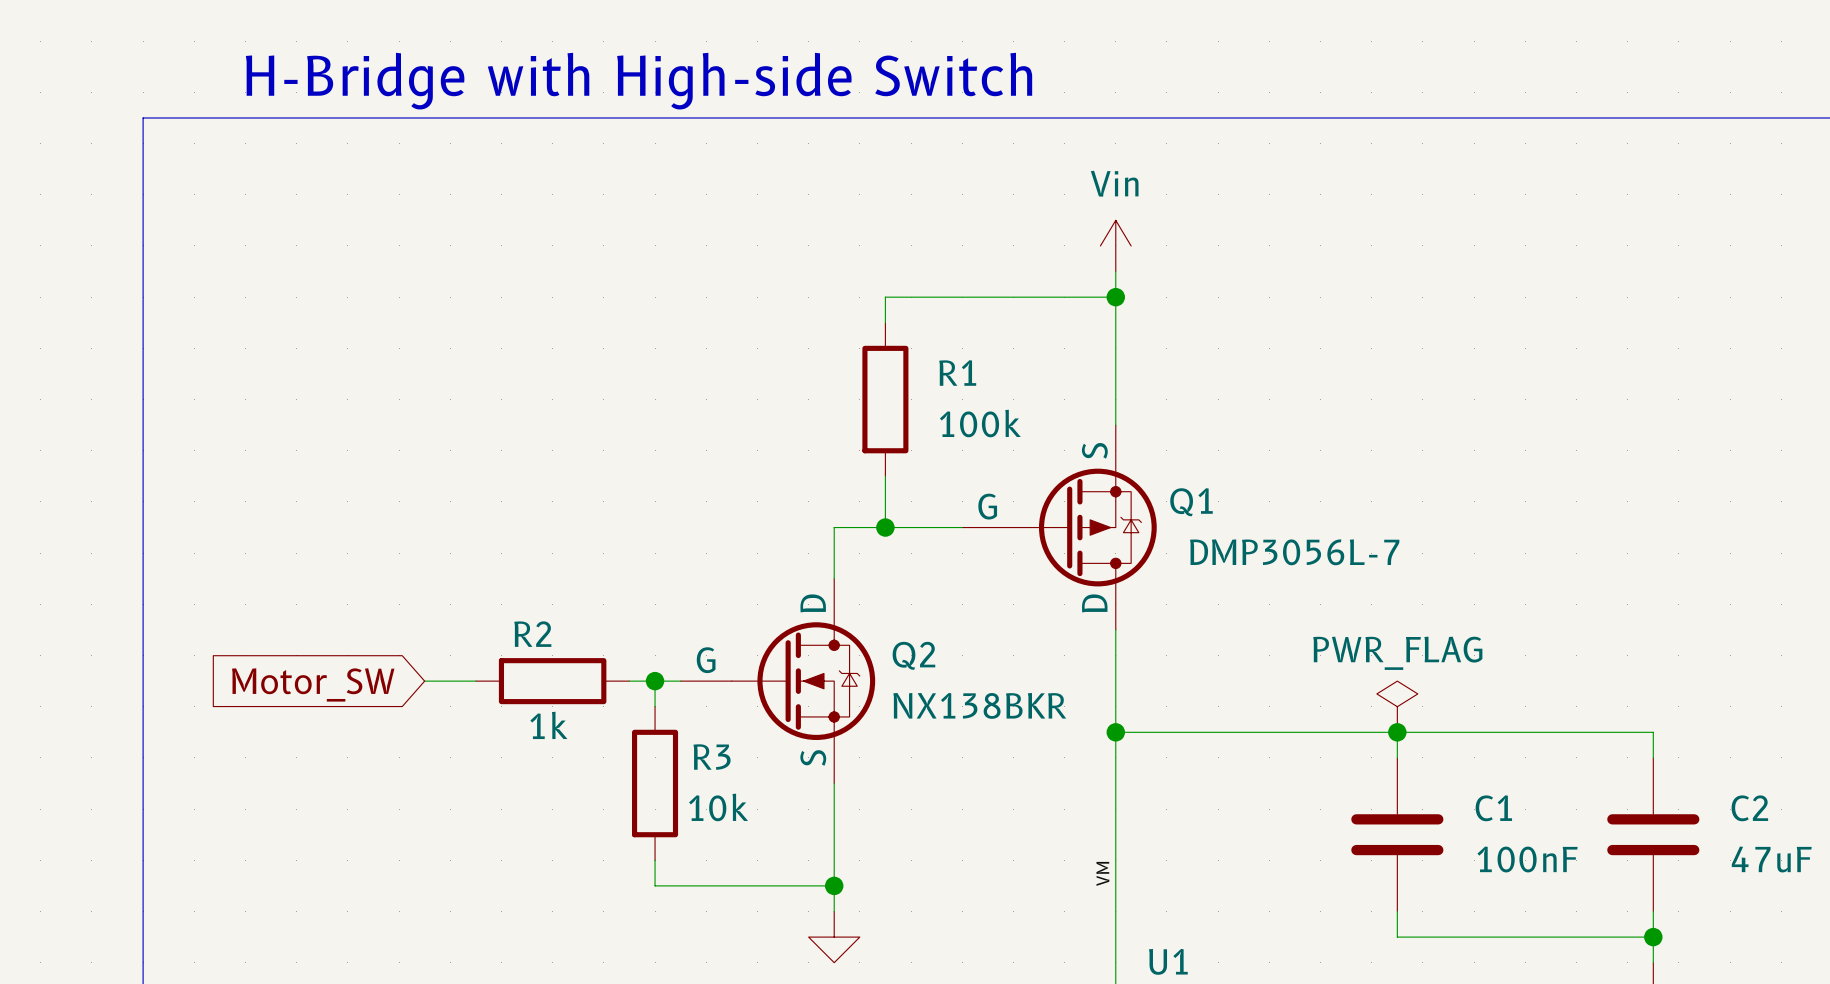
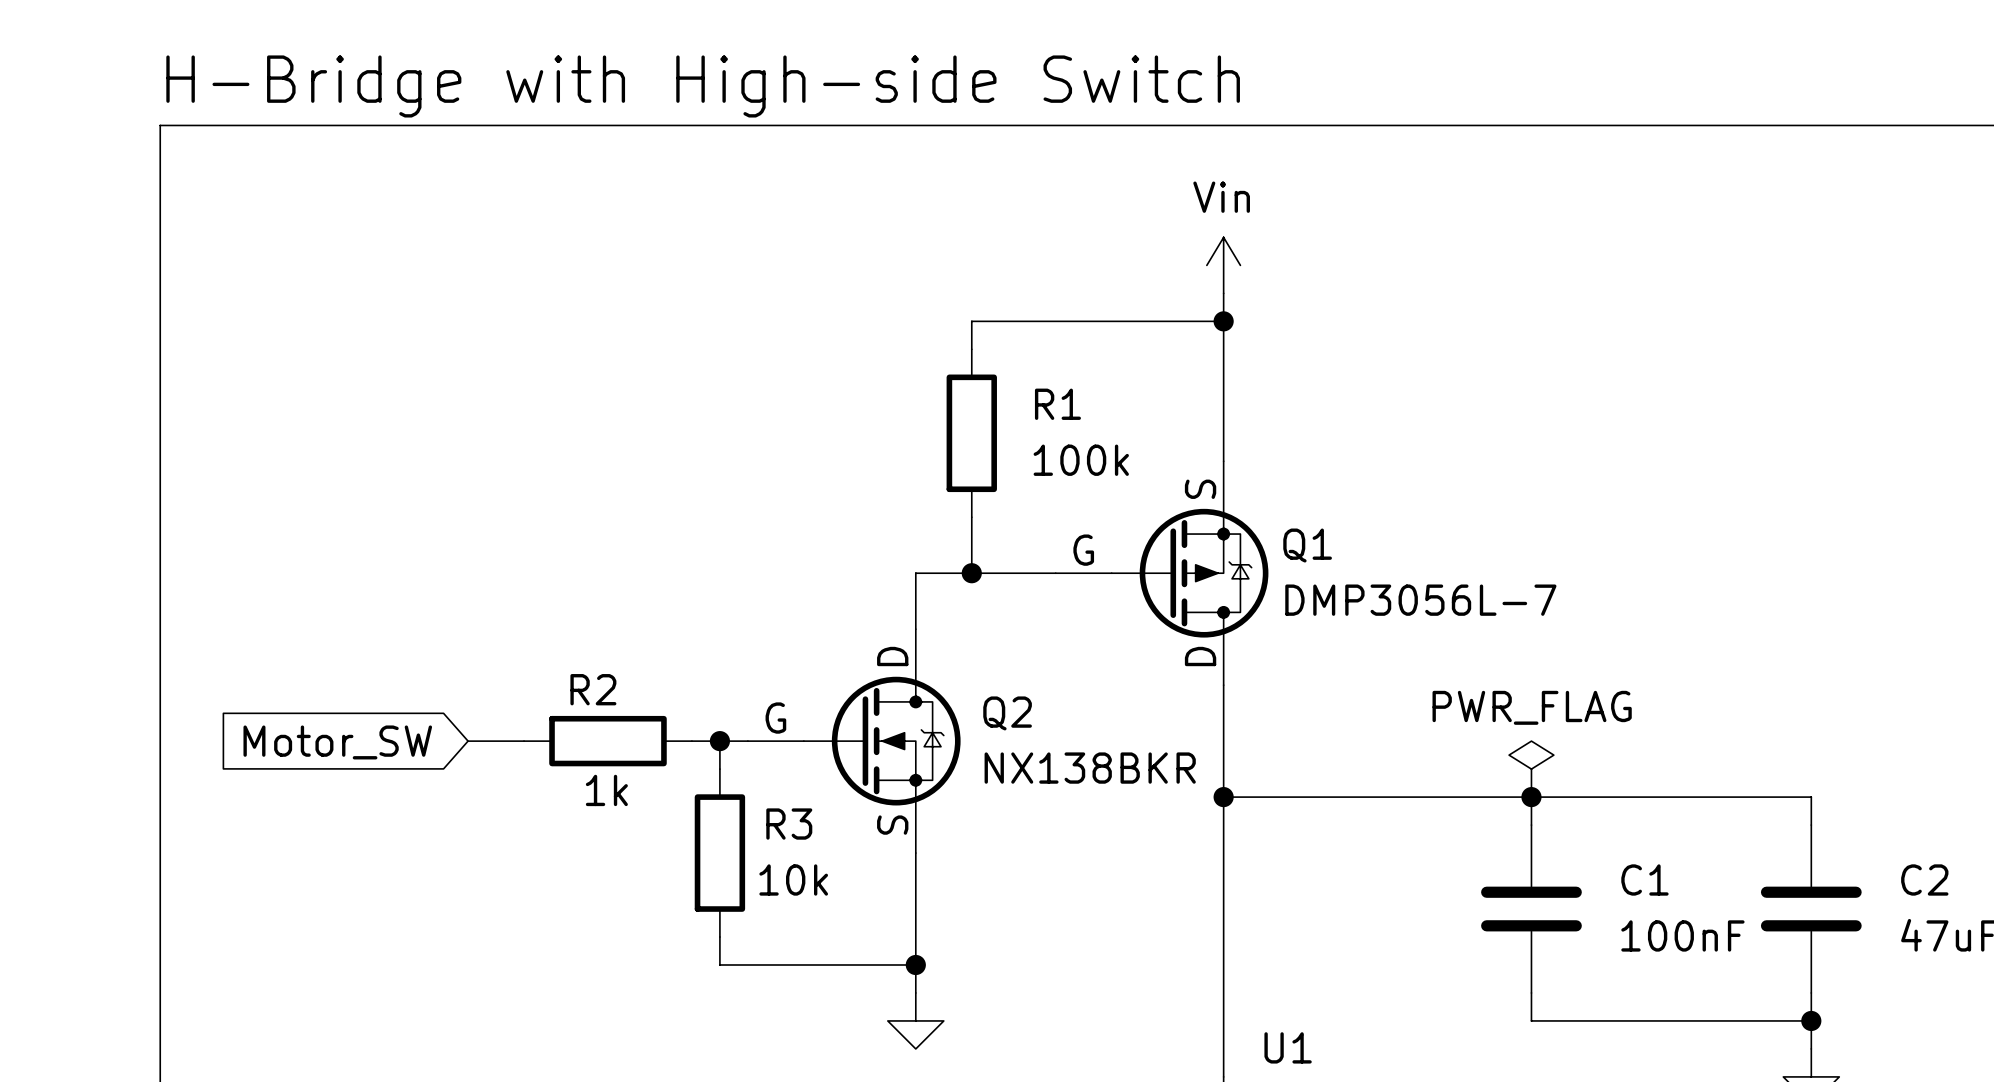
label: VM (1102, 873) -> none

